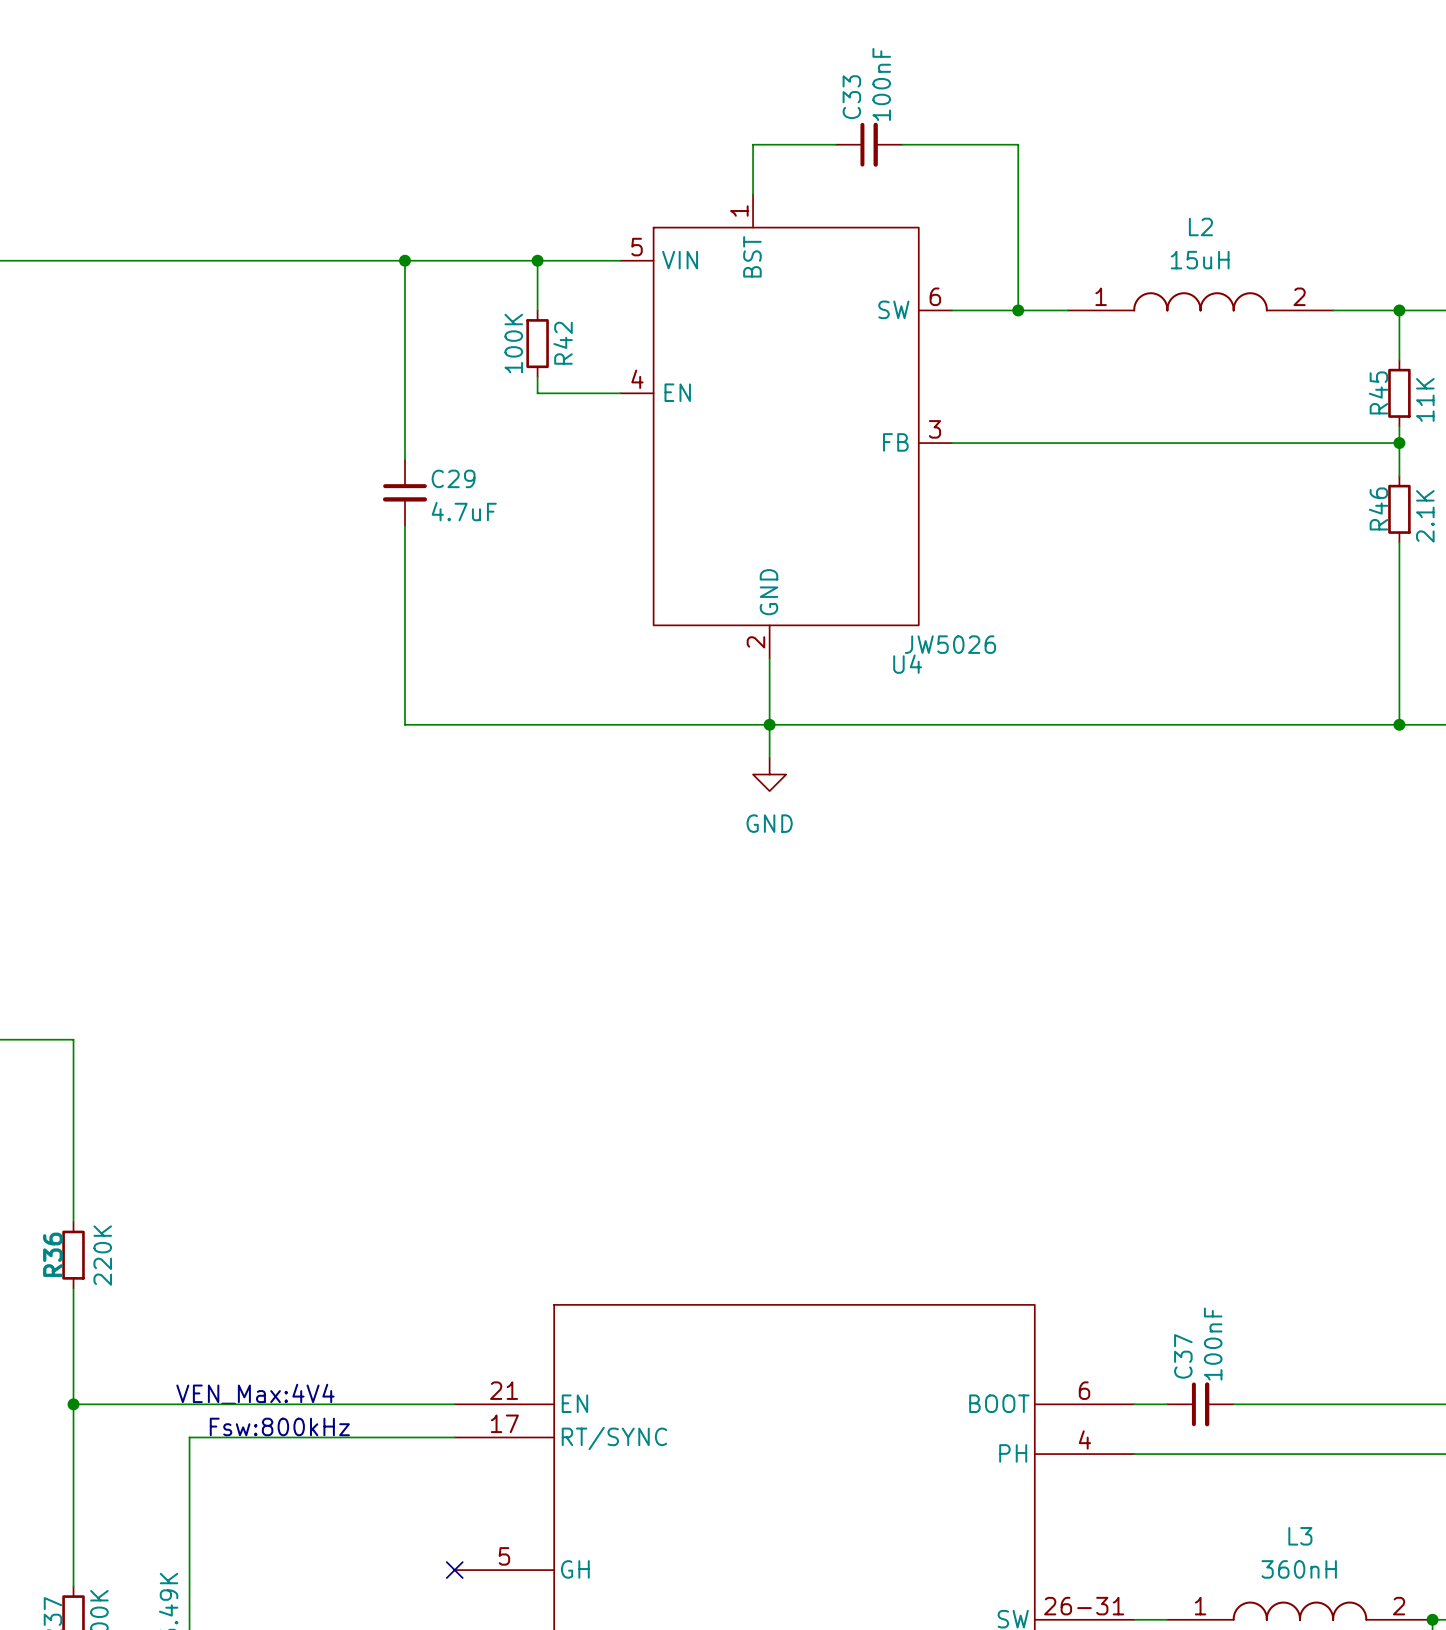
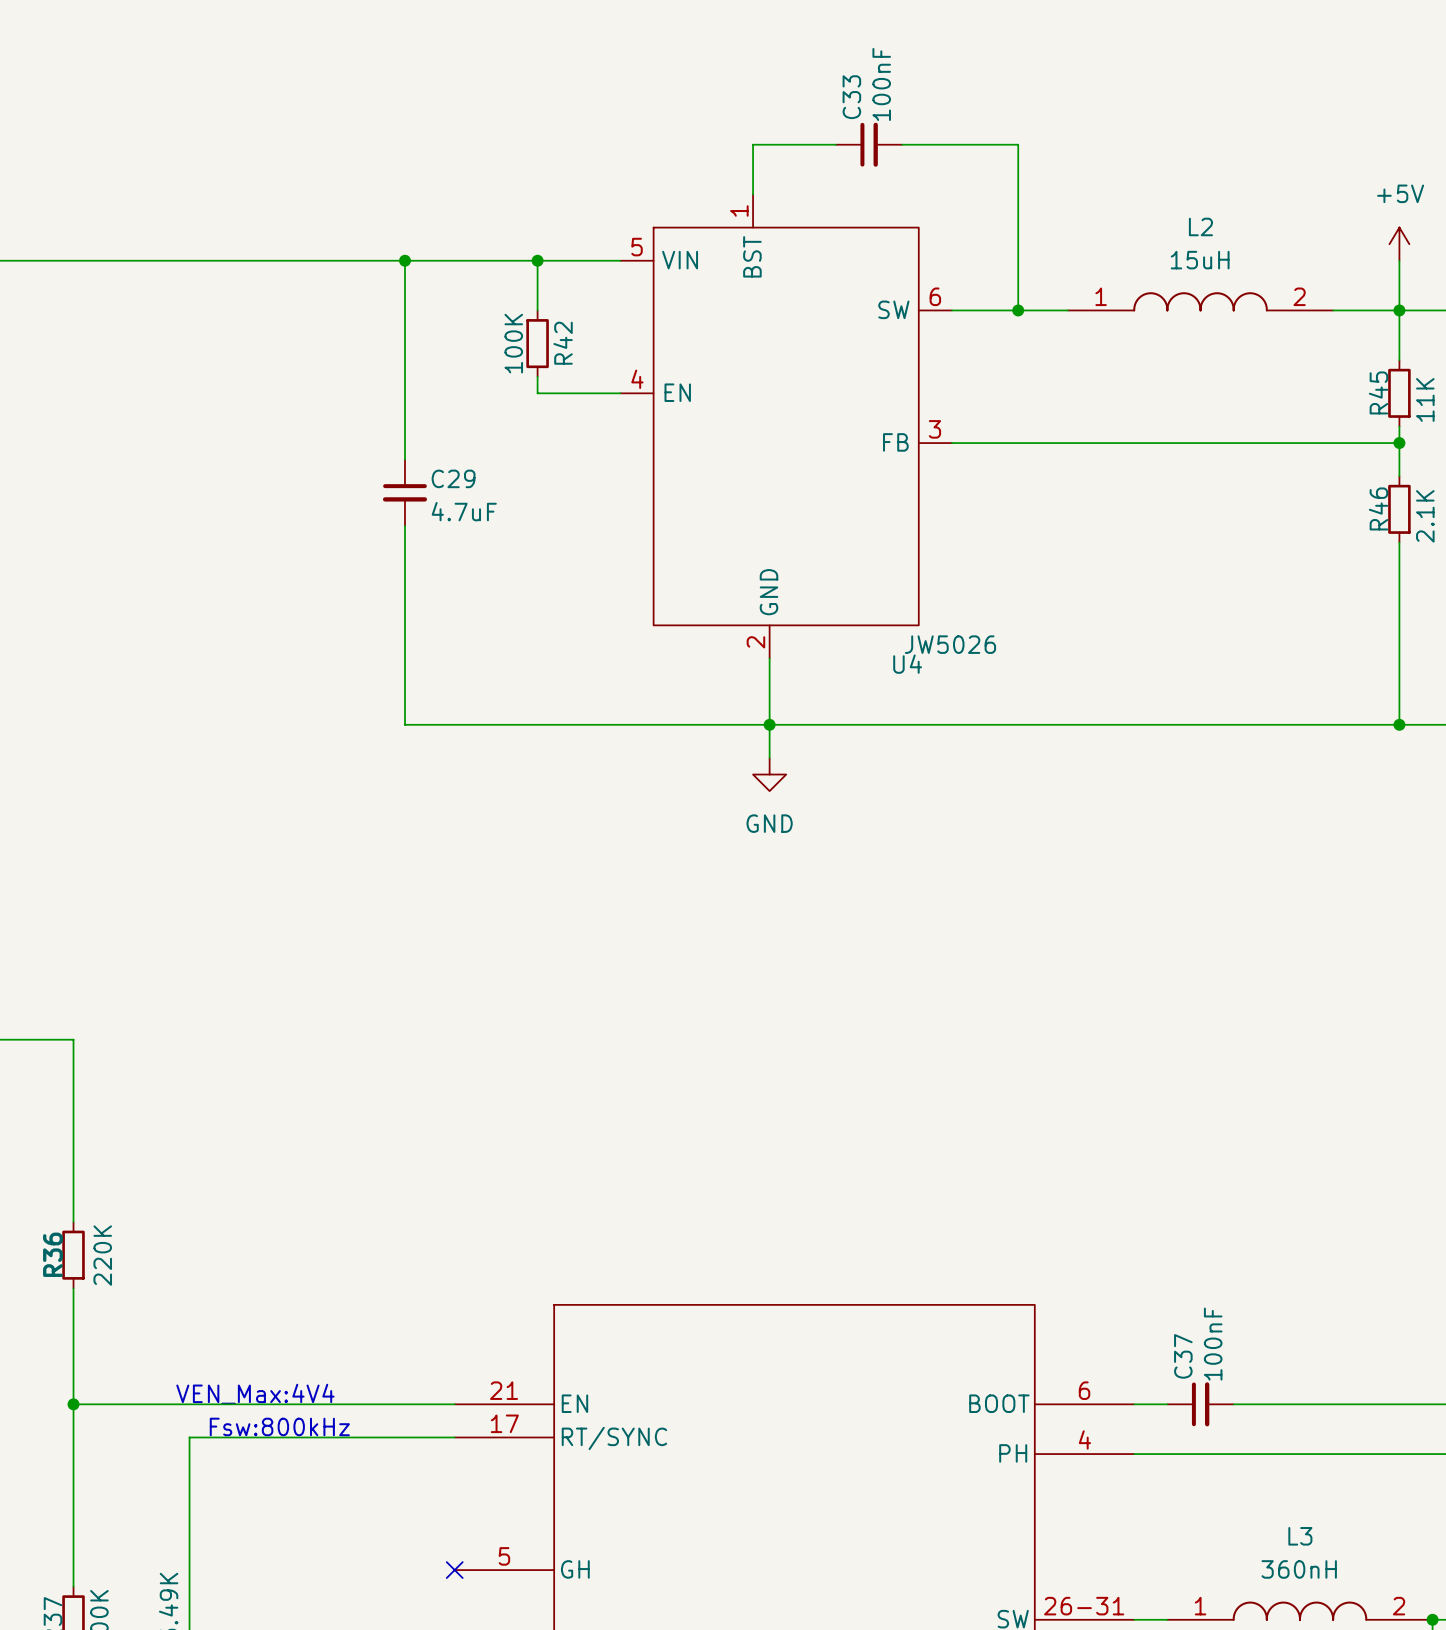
power symbol: none -> +5V (1399, 244)
wire: none -> (1399, 260) (1399, 310)

